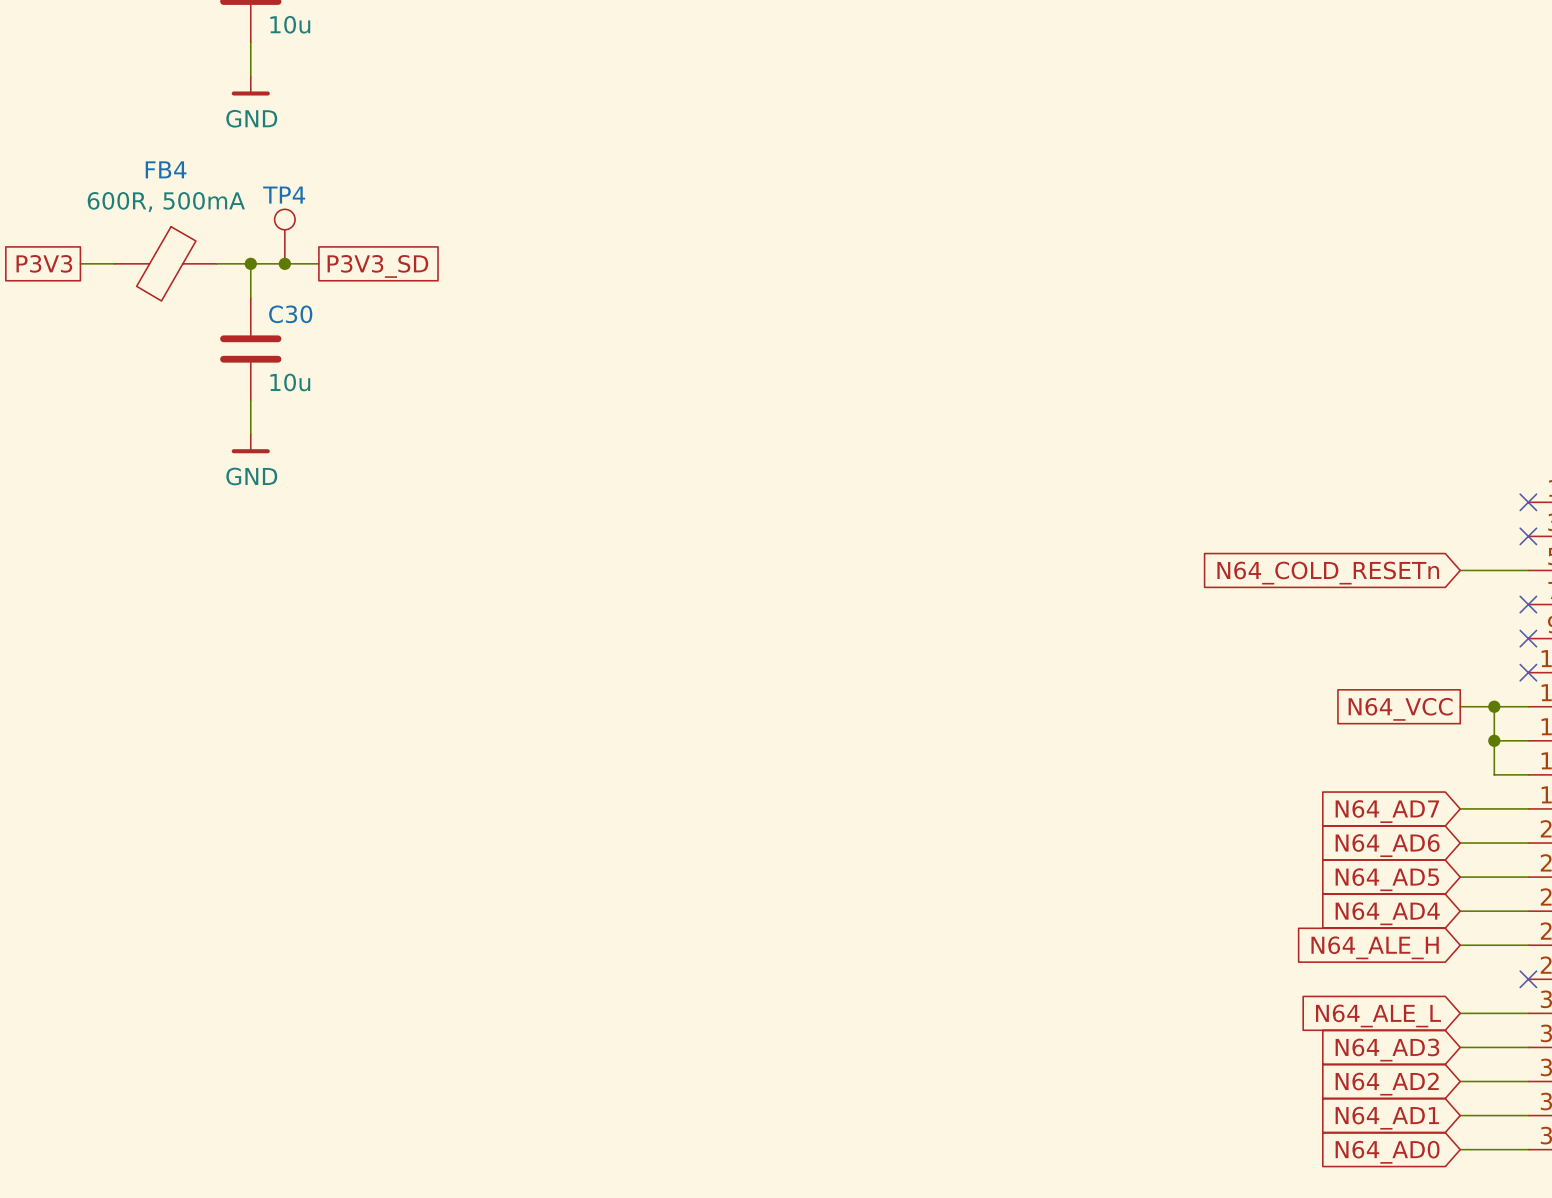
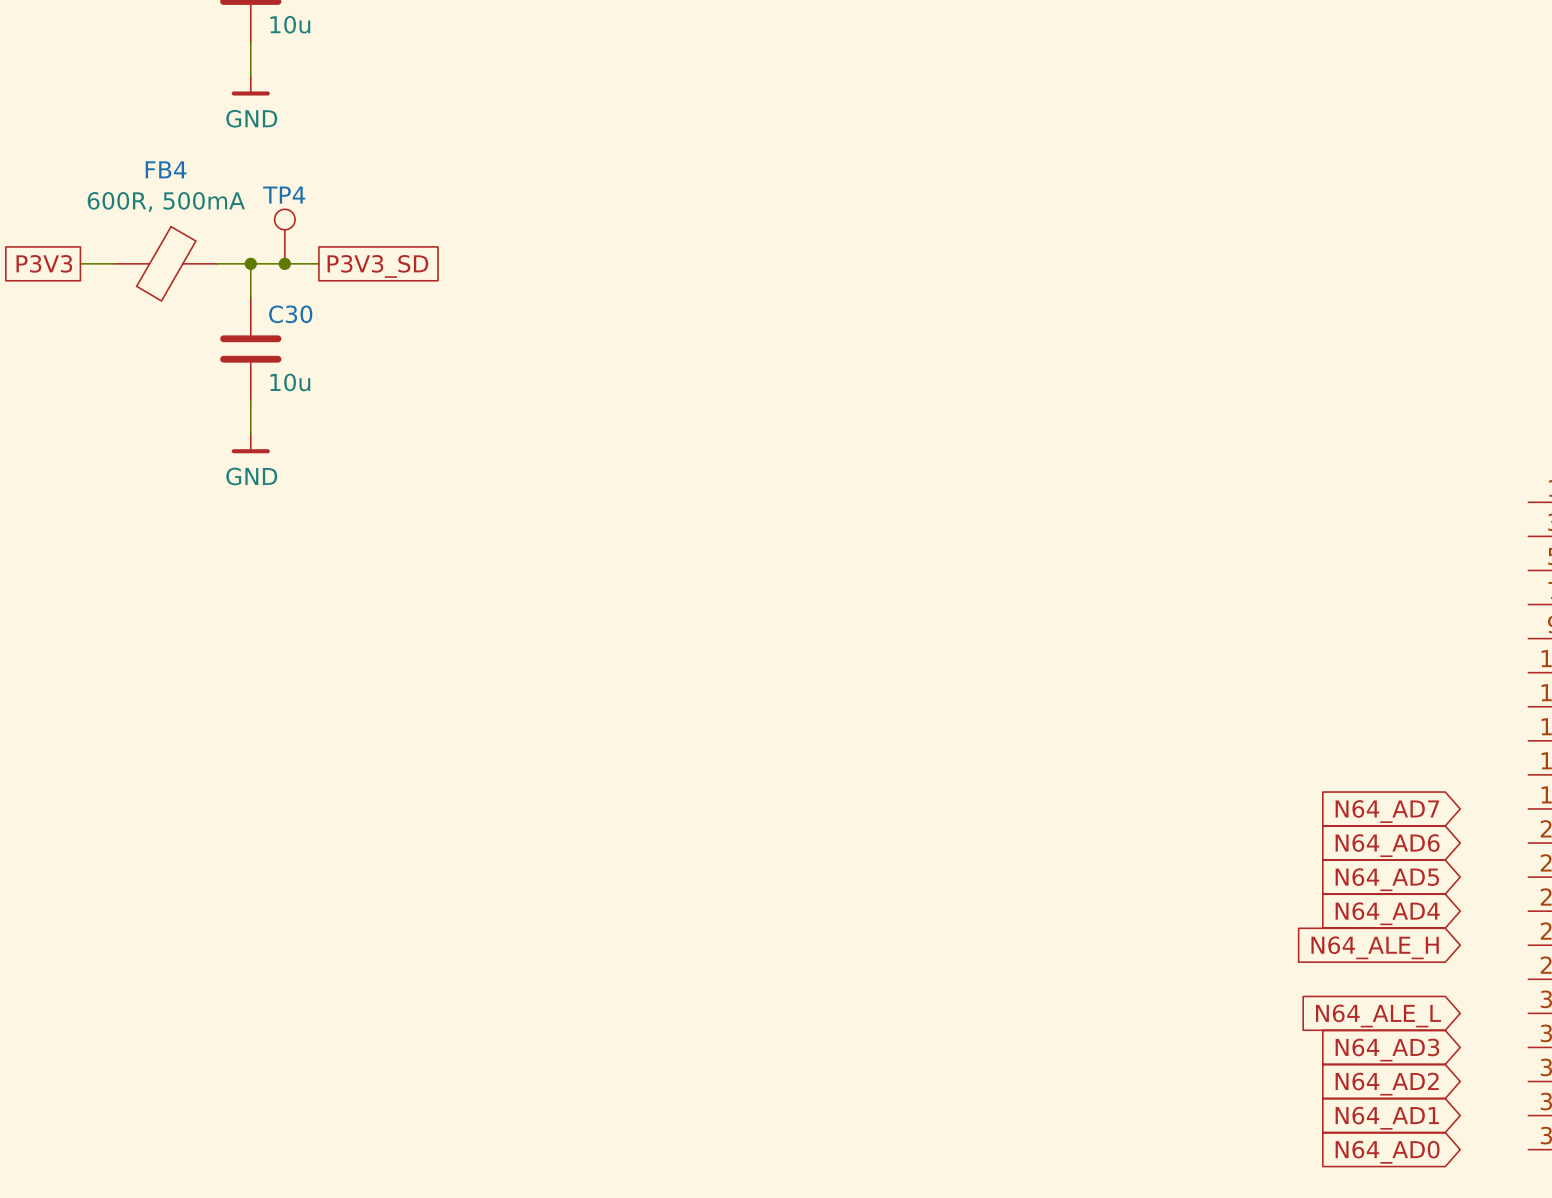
no-connect mark: (1528, 502) -> none
no-connect mark: (1528, 536) -> none
wire: (1460, 570) (1528, 570) -> none
global label: N64_COLD_RESETn (1328, 573) -> none
no-connect mark: (1528, 604) -> none
no-connect mark: (1528, 638) -> none
no-connect mark: (1528, 672) -> none
wire: (1460, 706) (1528, 706) -> none
wire: (1494, 706) (1494, 774) (1528, 774) -> none
junction: (1494, 706) -> none
global label: N64_VCC (1400, 709) -> none
wire: (1494, 740) (1528, 740) -> none
junction: (1494, 740) -> none
wire: (1460, 808) (1528, 808) -> none
wire: (1460, 843) (1528, 843) -> none
wire: (1460, 877) (1528, 877) -> none
wire: (1460, 911) (1528, 911) -> none
wire: (1460, 945) (1528, 945) -> none
no-connect mark: (1528, 979) -> none
wire: (1460, 1013) (1528, 1013) -> none
wire: (1460, 1047) (1528, 1047) -> none
wire: (1460, 1081) (1528, 1081) -> none
wire: (1460, 1115) (1528, 1115) -> none
wire: (1460, 1149) (1528, 1149) -> none

